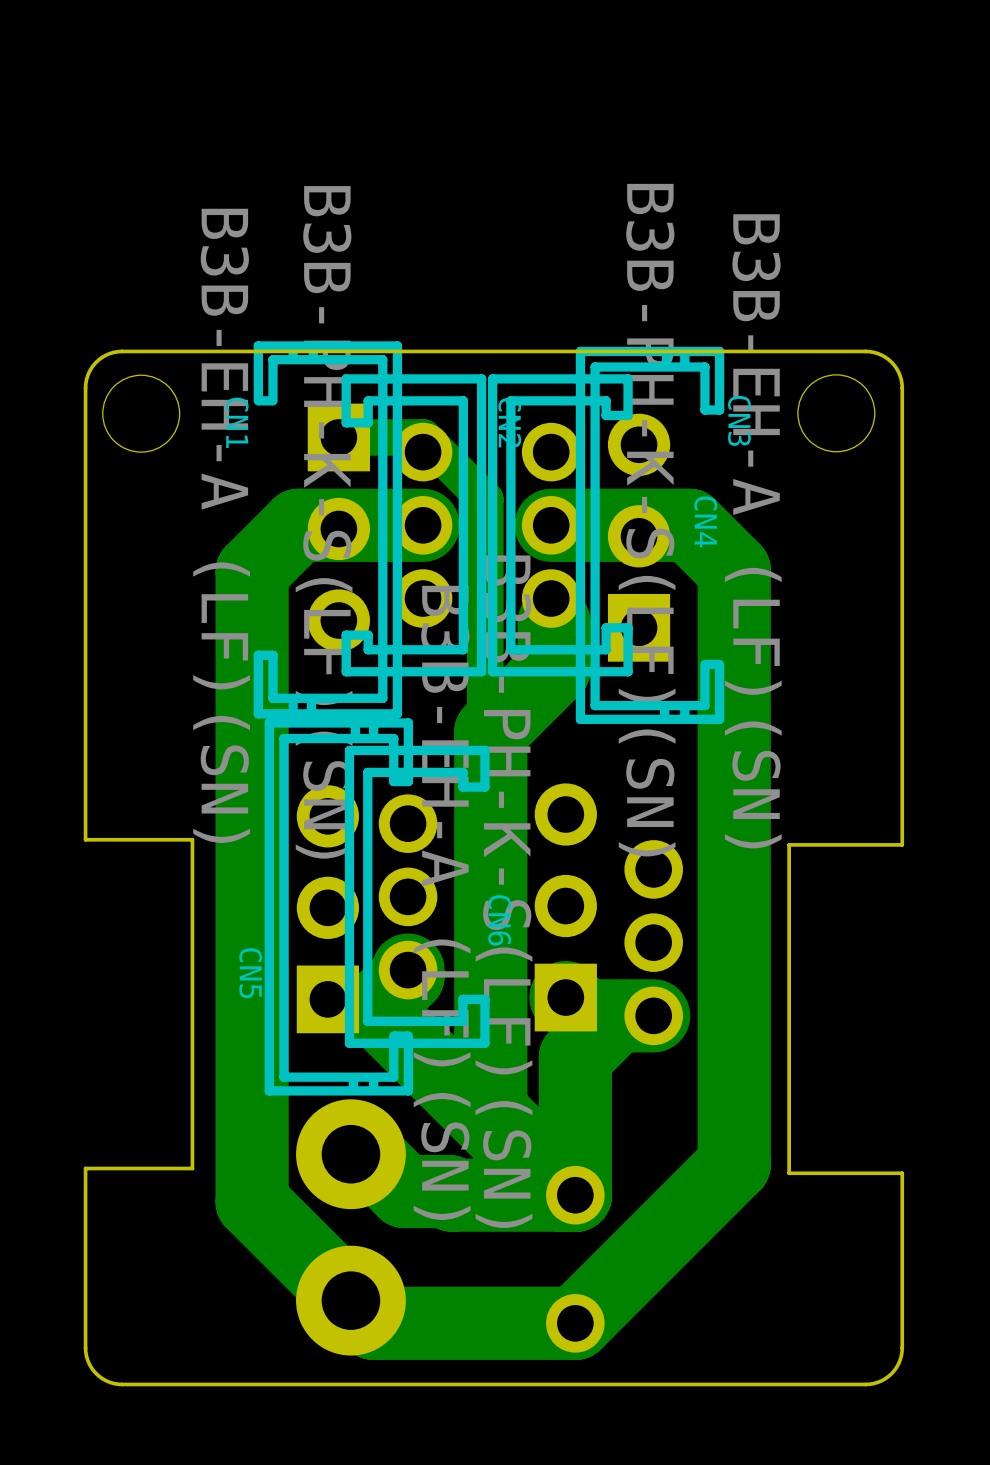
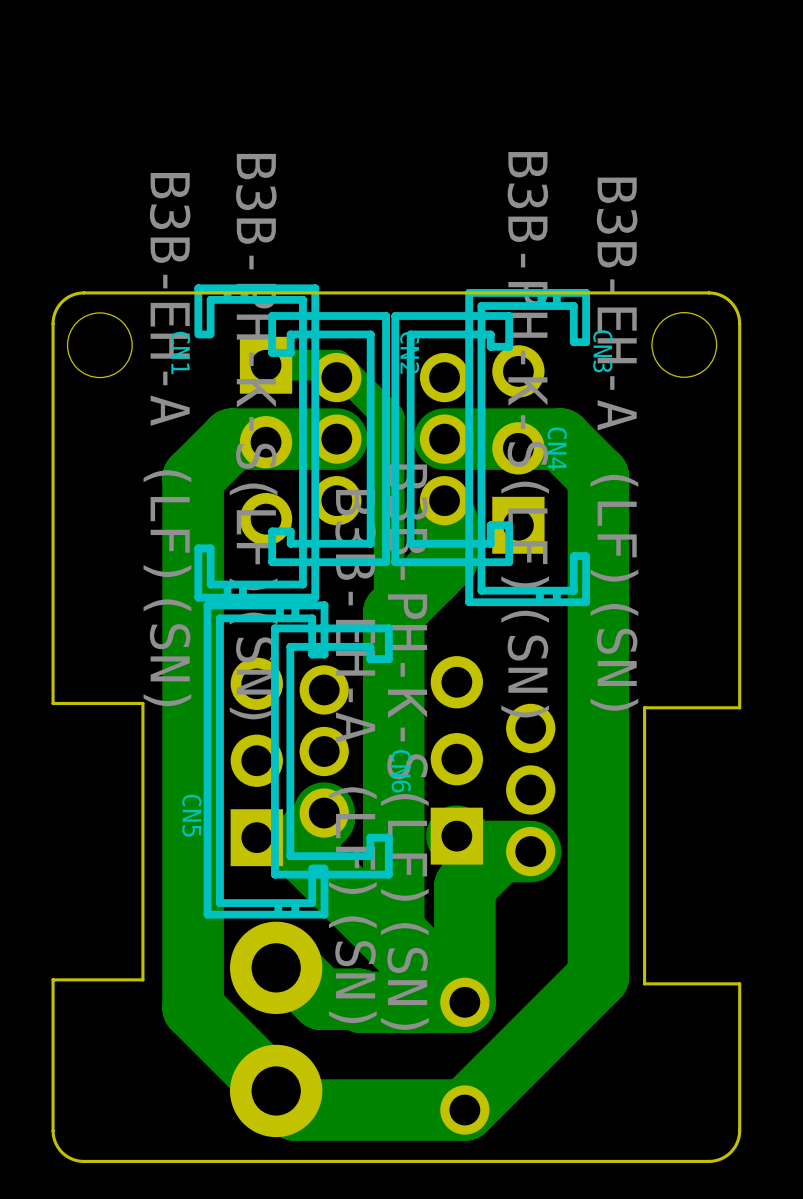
CN4 name position: CN4 (705, 521) -> CN4 (557, 448)

